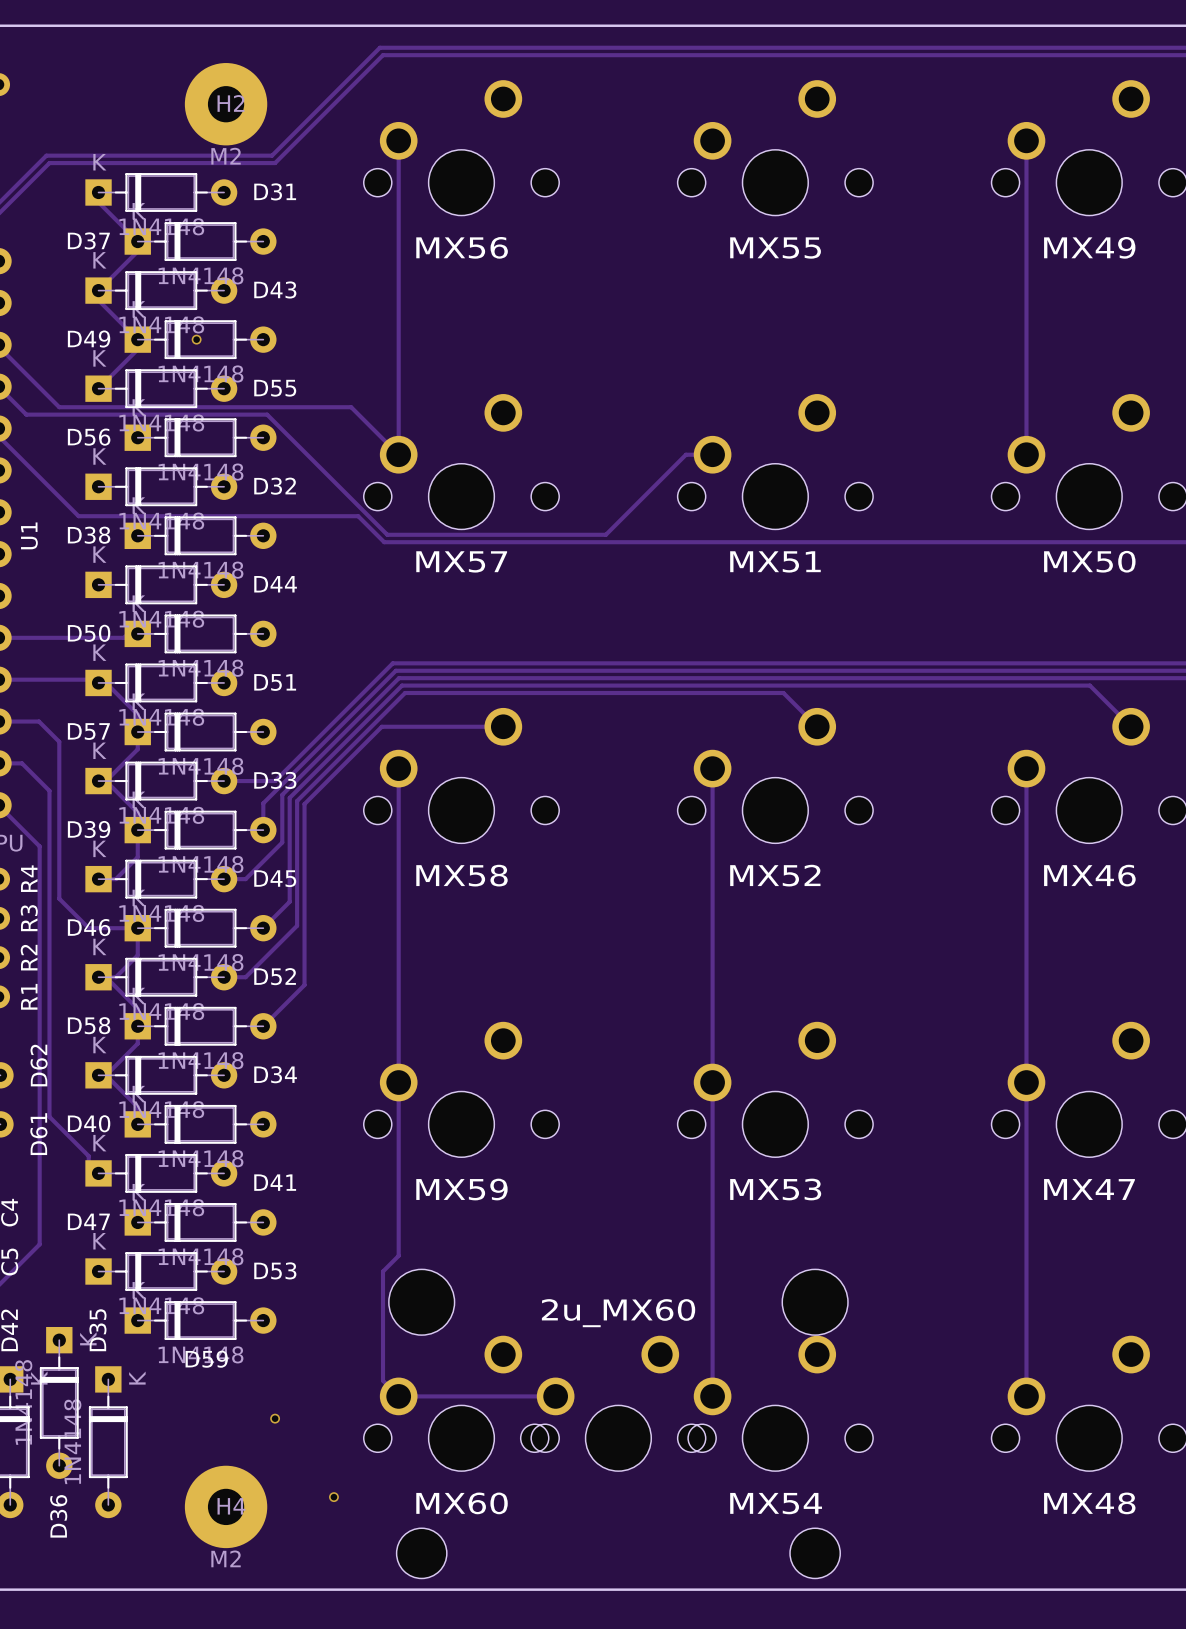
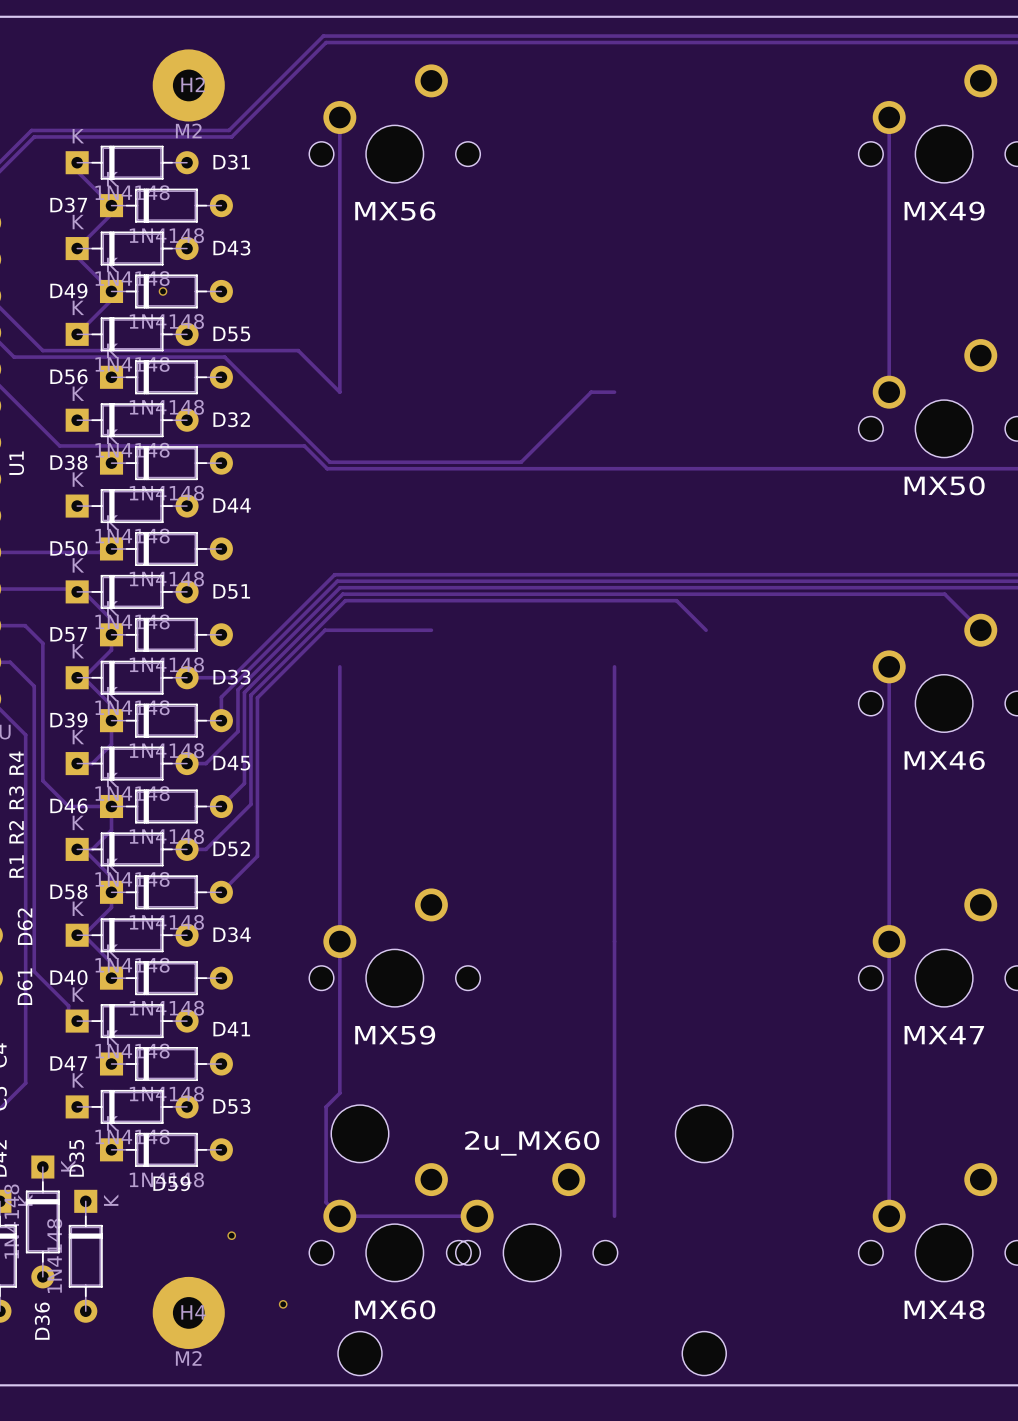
MX55: (775, 147) -> none
MX57: (461, 461) -> none
MX51: (775, 461) -> none
MX58: (461, 775) -> none
MX52: (775, 775) -> none
MX53: (775, 1089) -> none
MX54: (775, 1403) -> none

